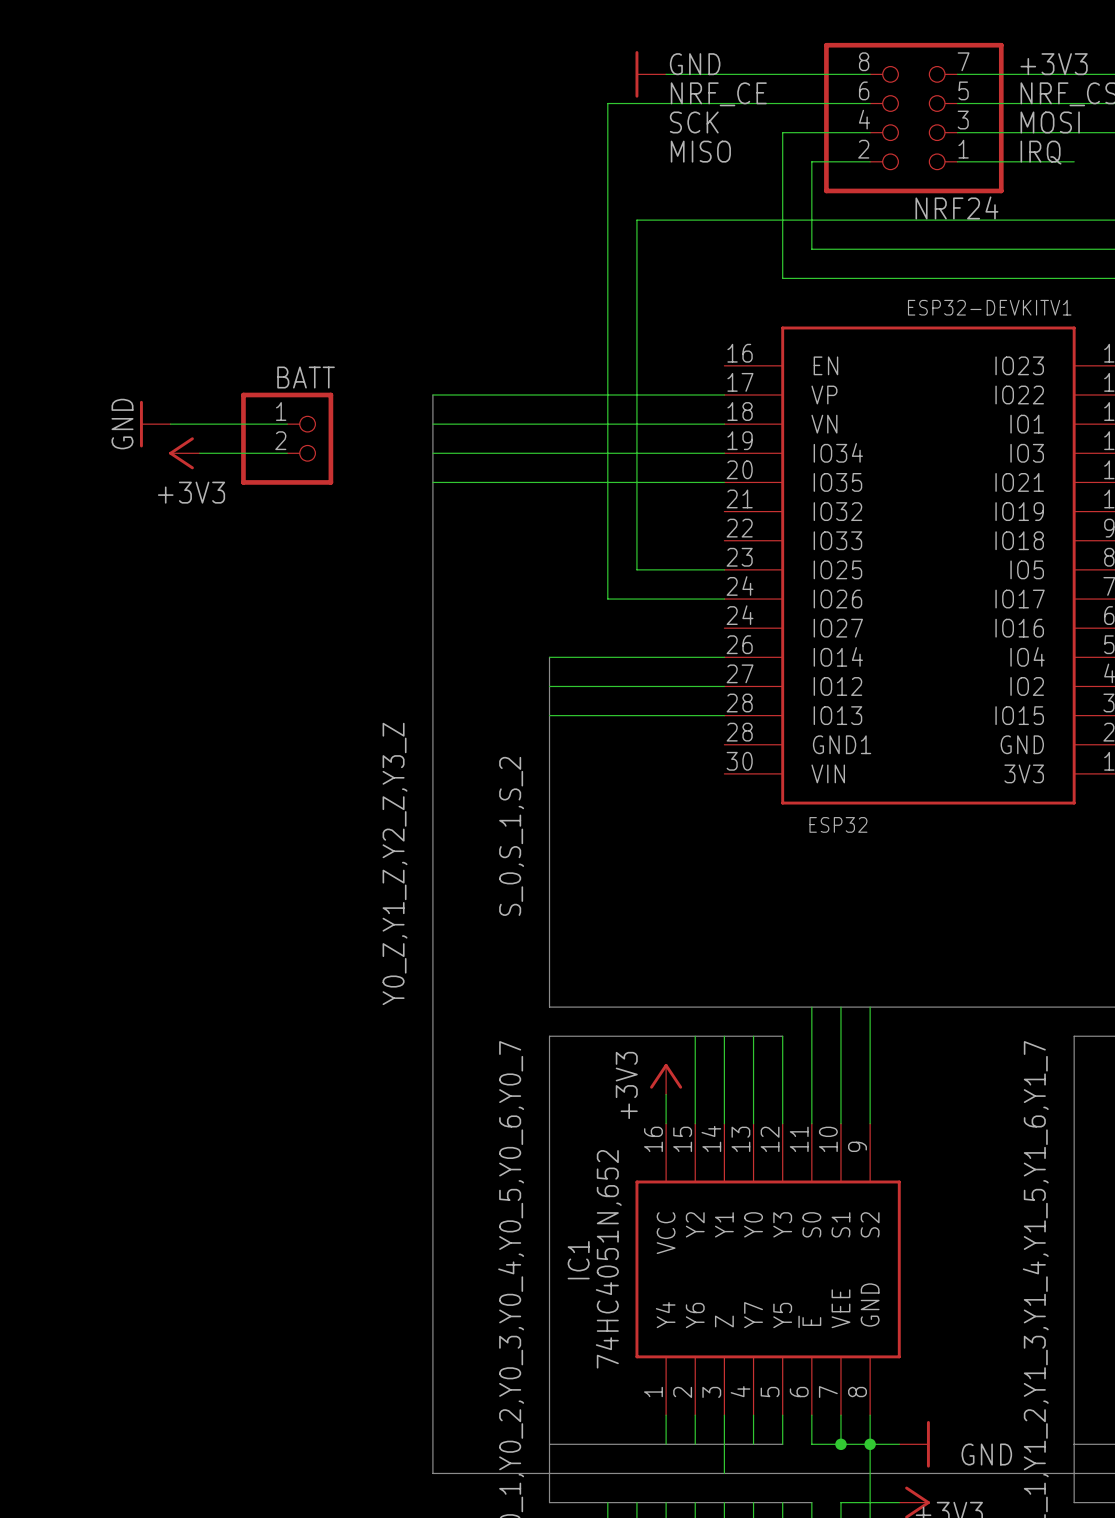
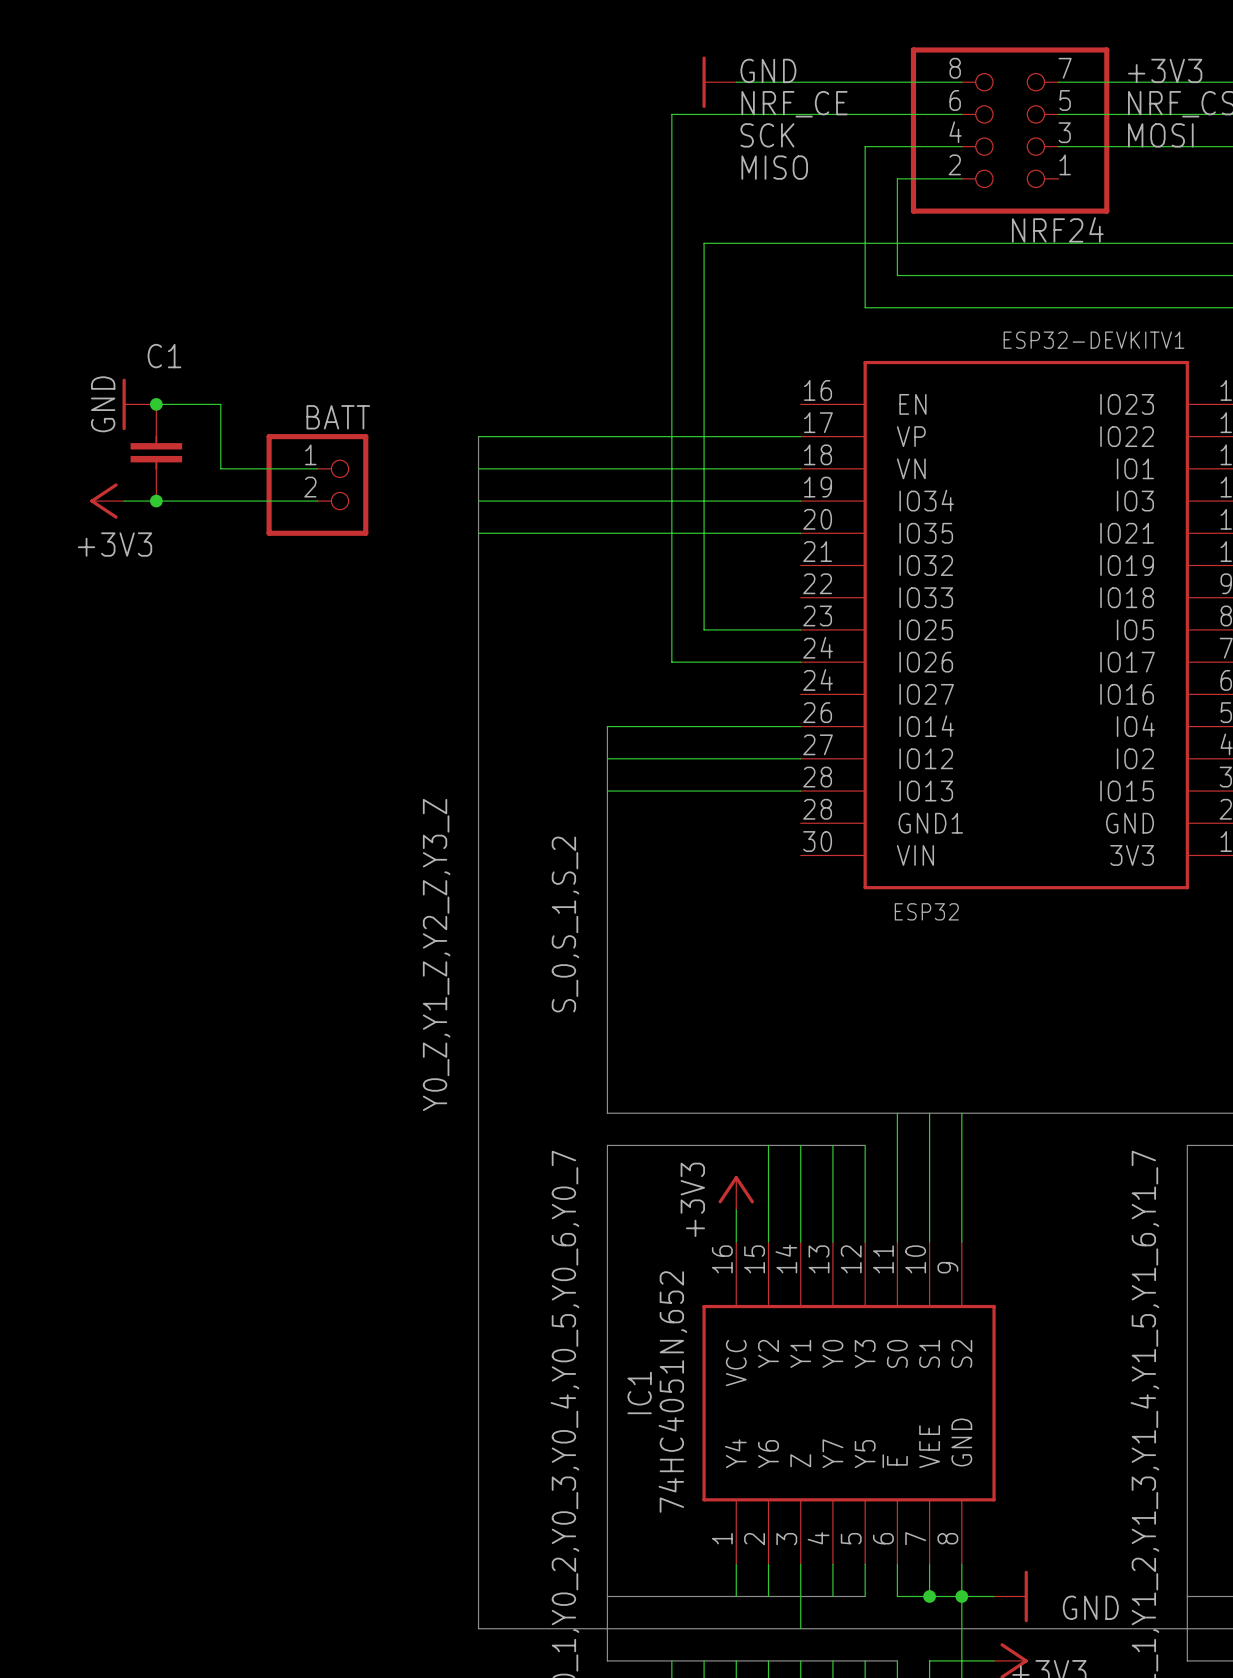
label: IRQ (1040, 152) -> none
wire: (957, 161) (1074, 161) -> none
junction: none -> (156, 404)
C1: none -> (156, 452)
power symbol position: GND (155, 424) -> GND (139, 404)
wire: (170, 424) (199, 424) -> (156, 404) (220, 404) (220, 468)
wire: none -> (124, 501) (220, 501)
junction: none -> (156, 501)
power symbol position: +3V3 (184, 453) -> +3V3 (107, 501)

